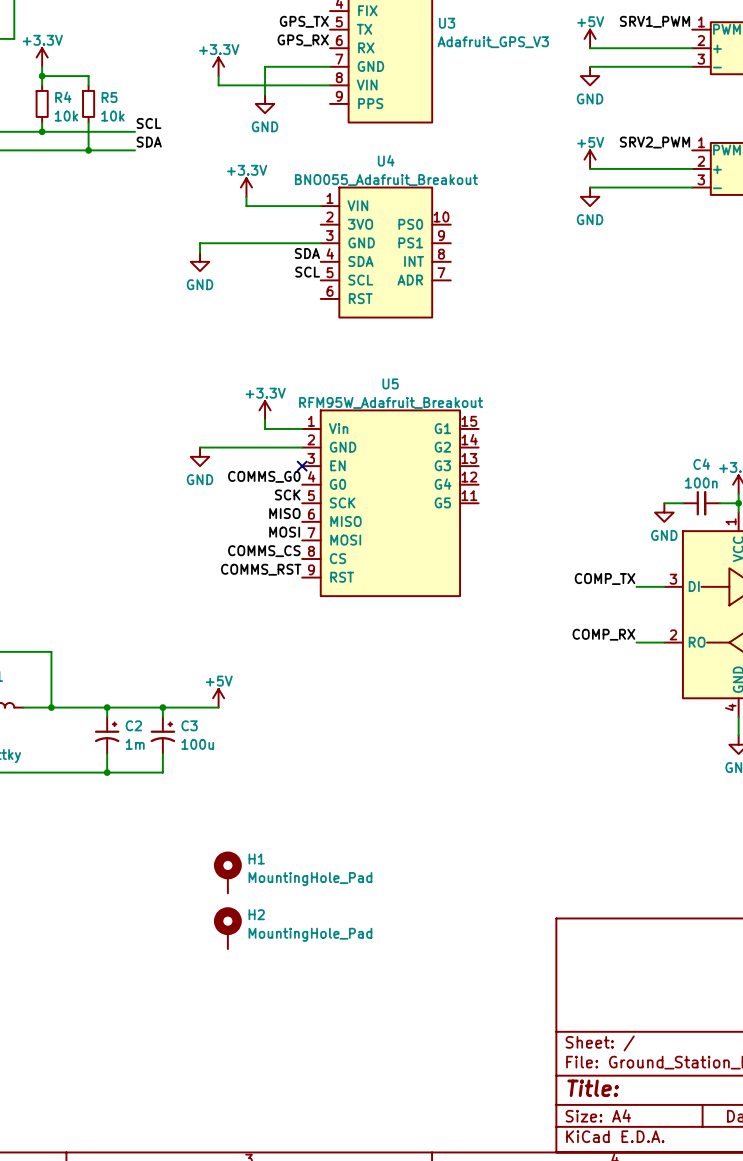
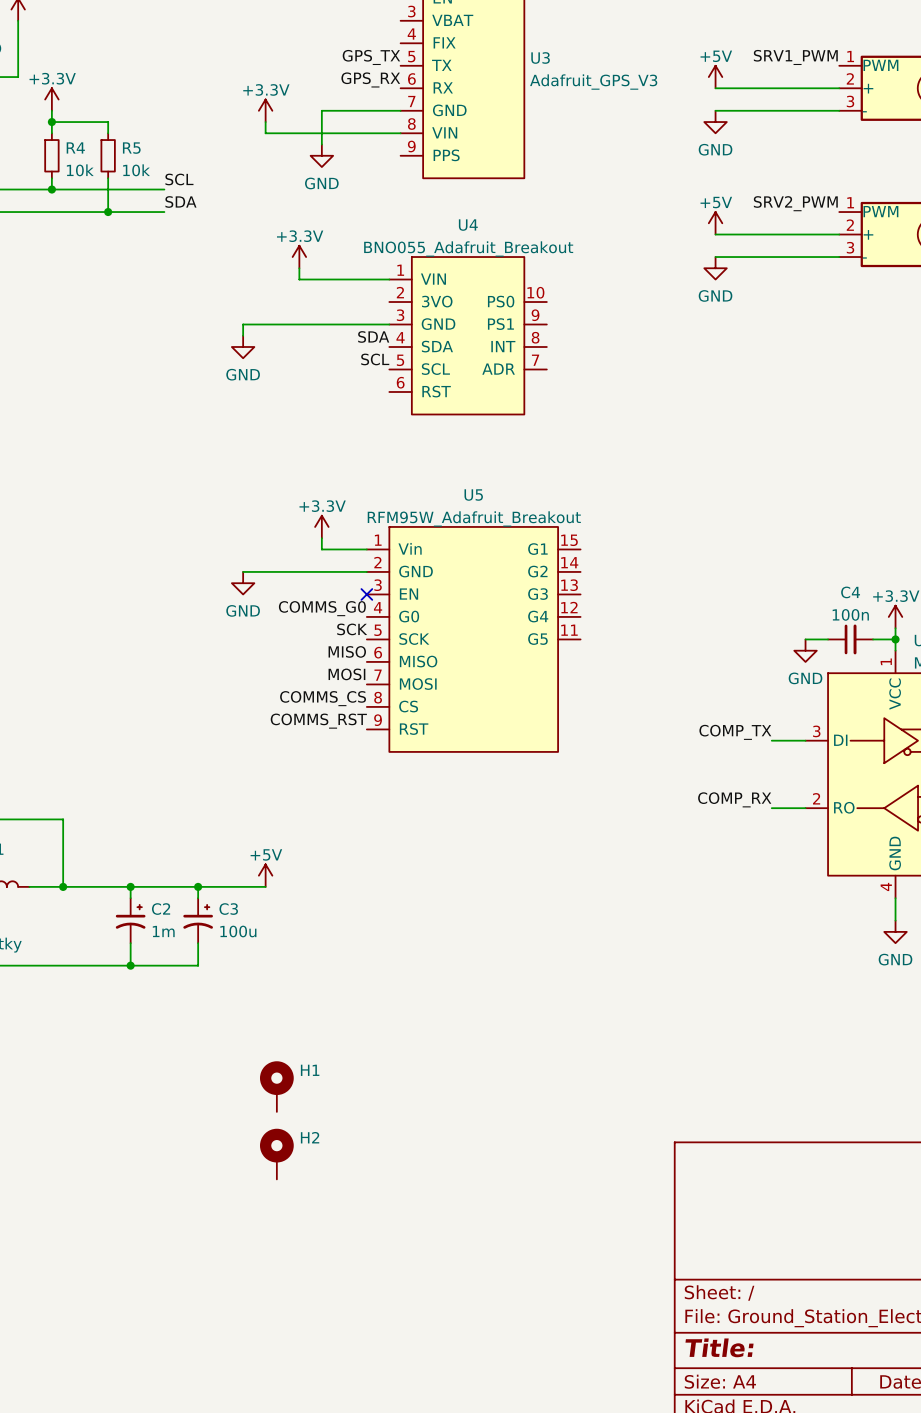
H1 value: MountingHole_Pad (310, 879) -> none
H2 value: MountingHole_Pad (310, 934) -> none

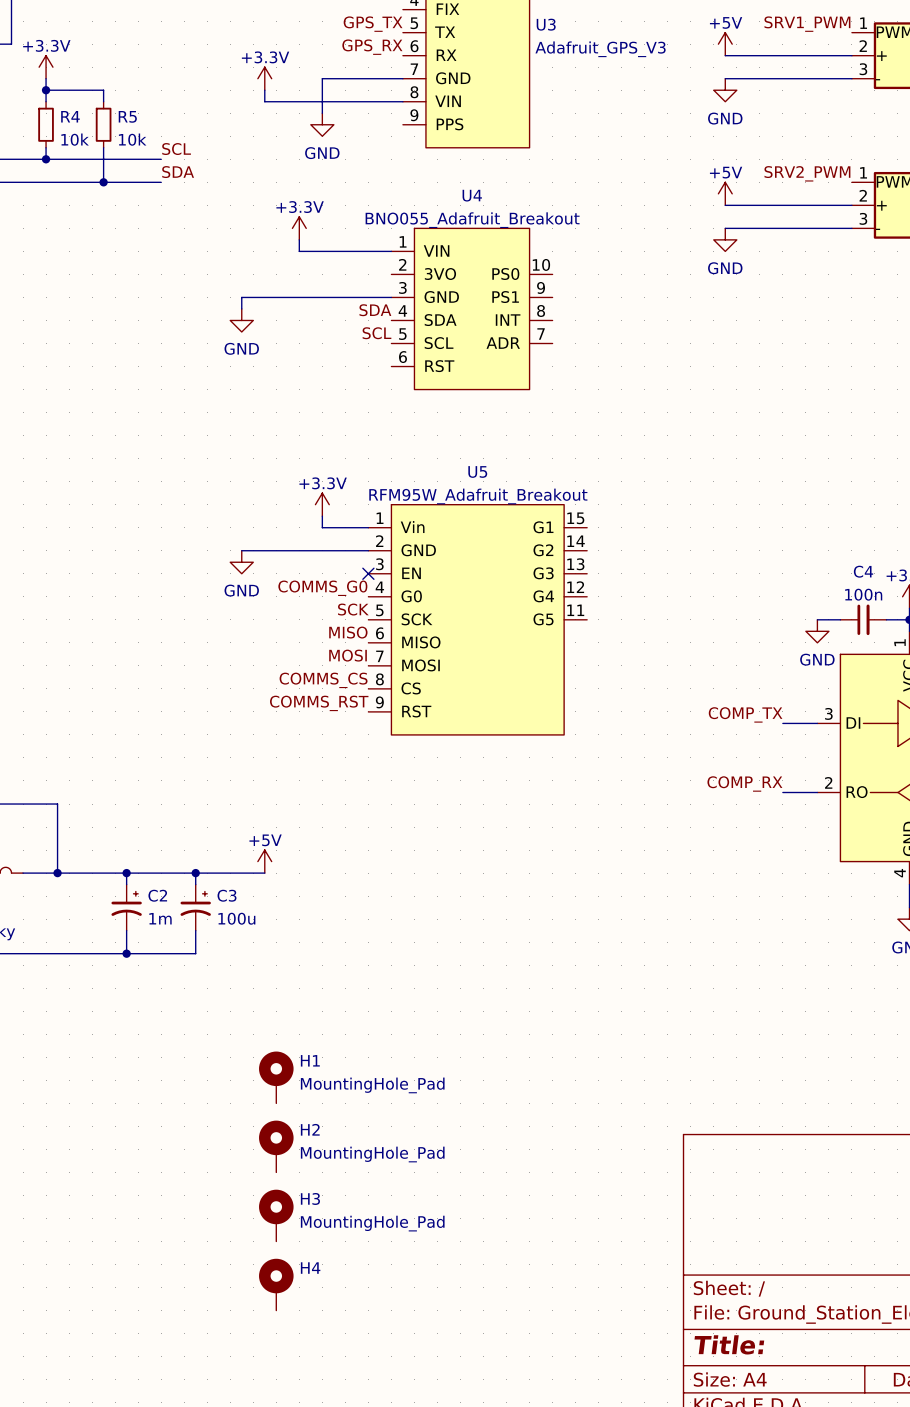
H1 value: none -> MountingHole_Pad (372, 1085)
H2 value: none -> MountingHole_Pad (372, 1154)
H3: none -> MountingHole_Pad (276, 1215)
H4: none -> (276, 1284)

